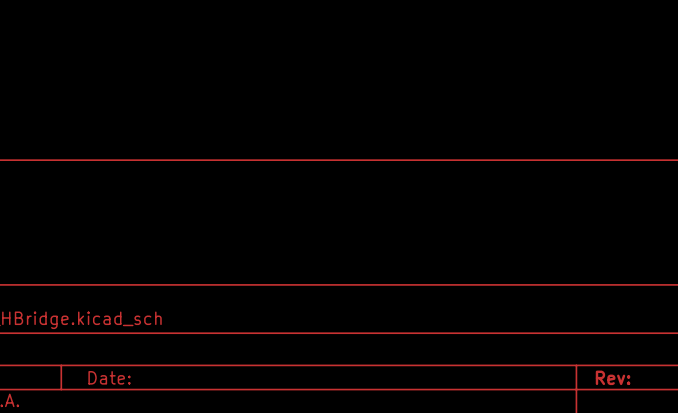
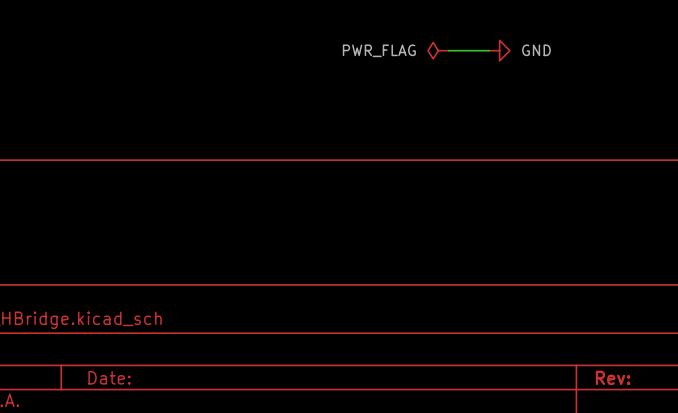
power symbol: none -> PWR_FLAG (438, 50)
wire: none -> (448, 50) (489, 50)
power symbol: none -> GND (499, 50)

